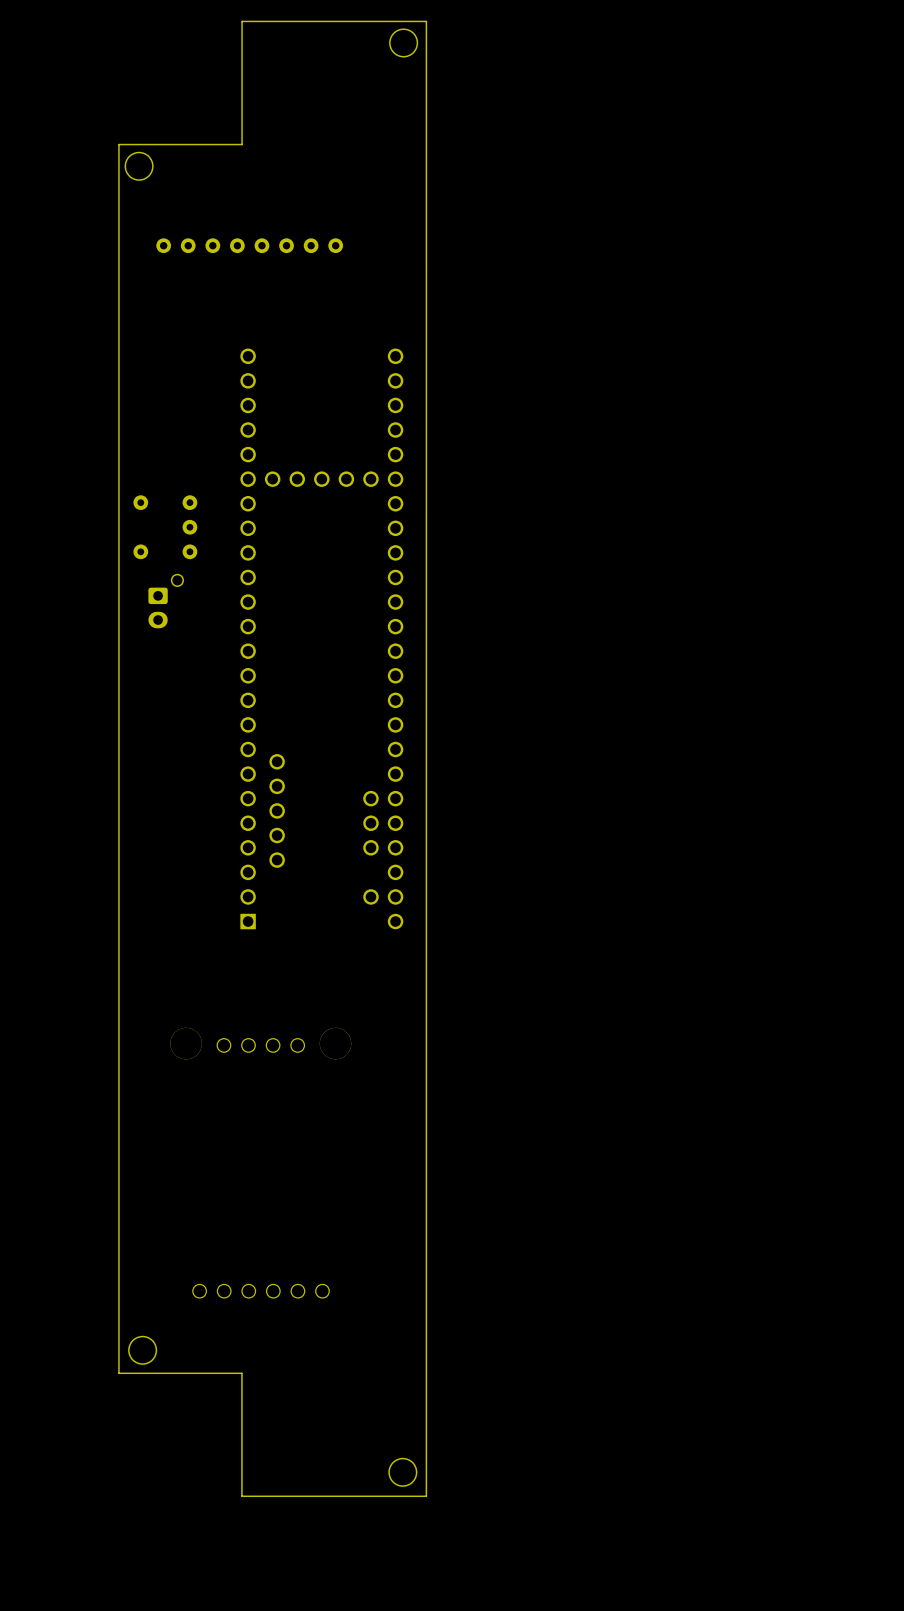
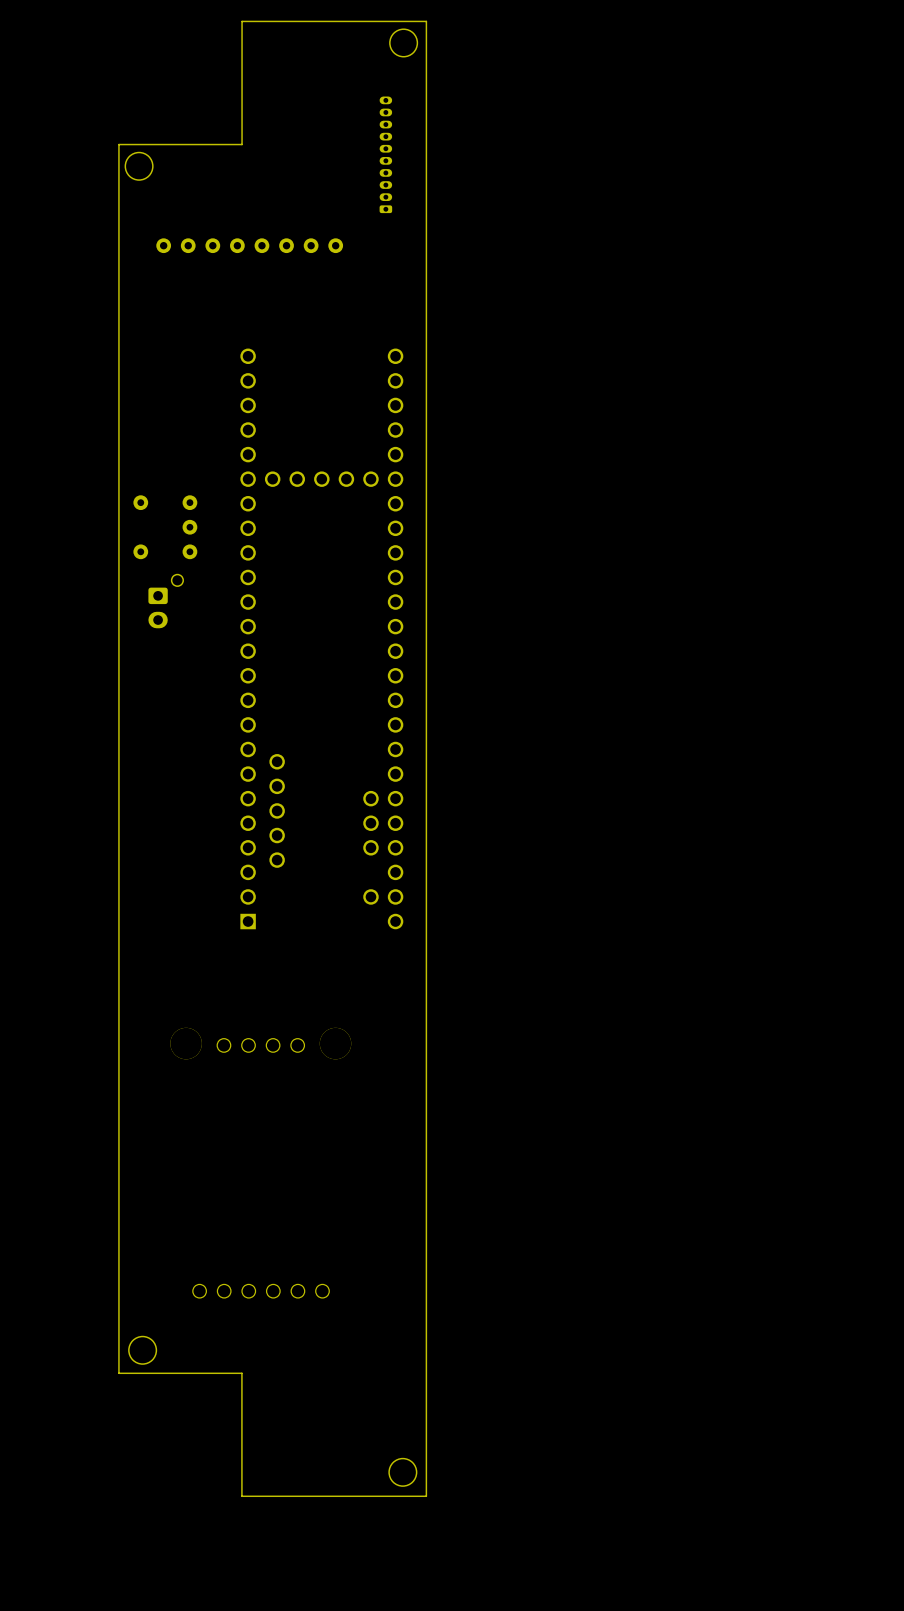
part: none -> (385, 154)

